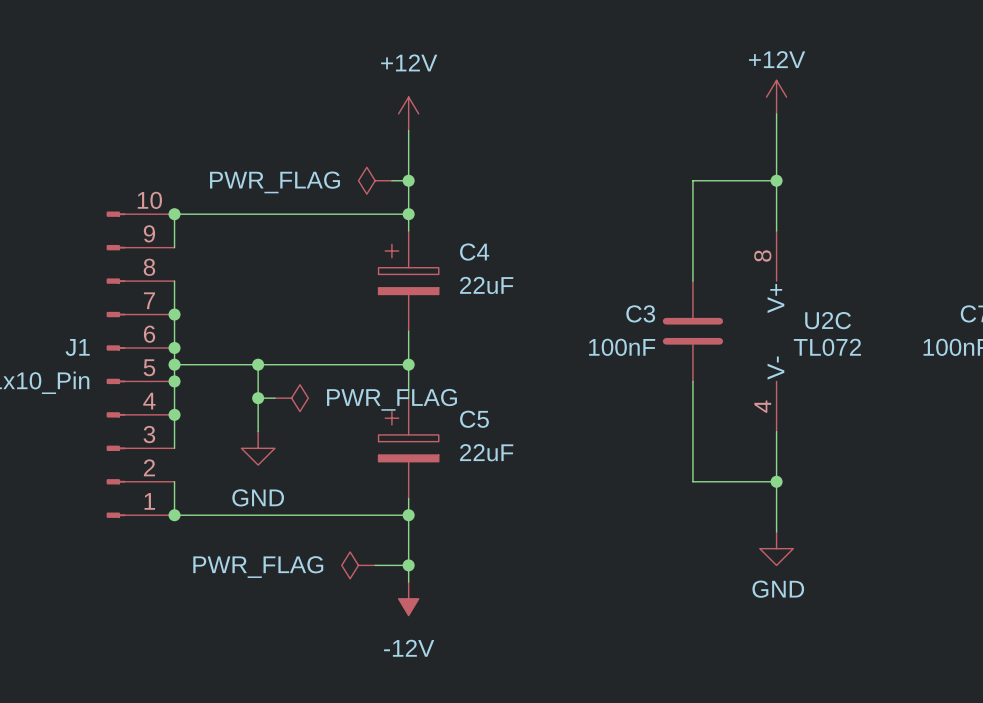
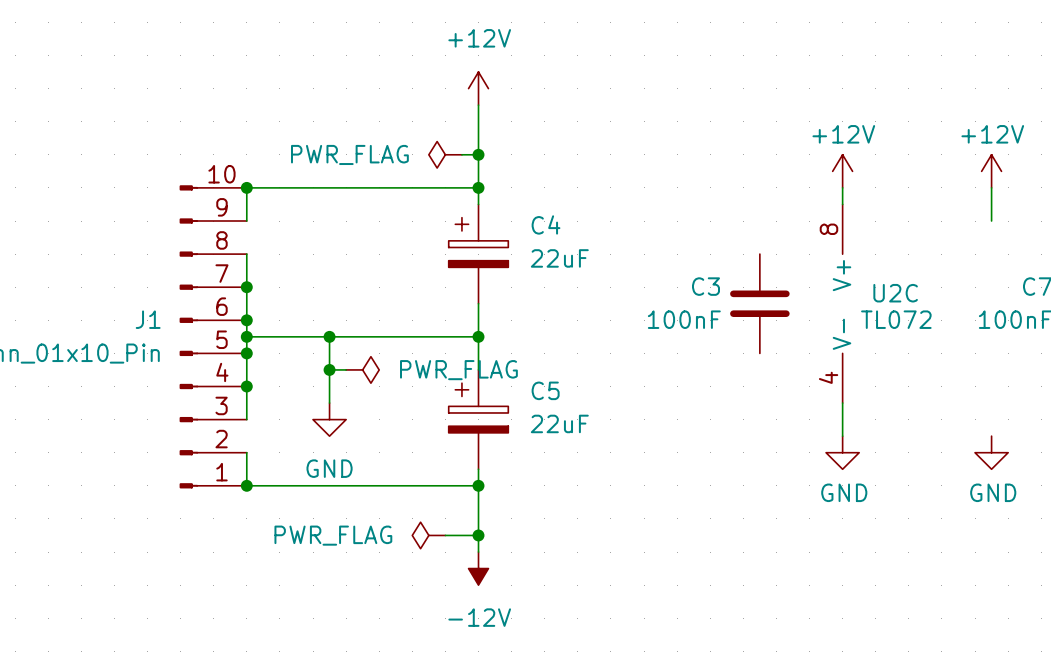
power symbol: +12V (776, 97) -> none
wire: (776, 113) (776, 214) -> none
wire: (776, 180) (692, 180) (692, 281) -> none
junction: (776, 180) -> none
power symbol: none -> +12V (842, 171)
power symbol: none -> +12V (991, 171)
wire: none -> (991, 187) (991, 221)
wire: (692, 381) (692, 481) (776, 481) -> none
wire: (776, 465) (776, 531) -> none
junction: (776, 481) -> none
power symbol: none -> GND (991, 452)
power symbol position: GND (776, 548) -> GND (842, 452)

